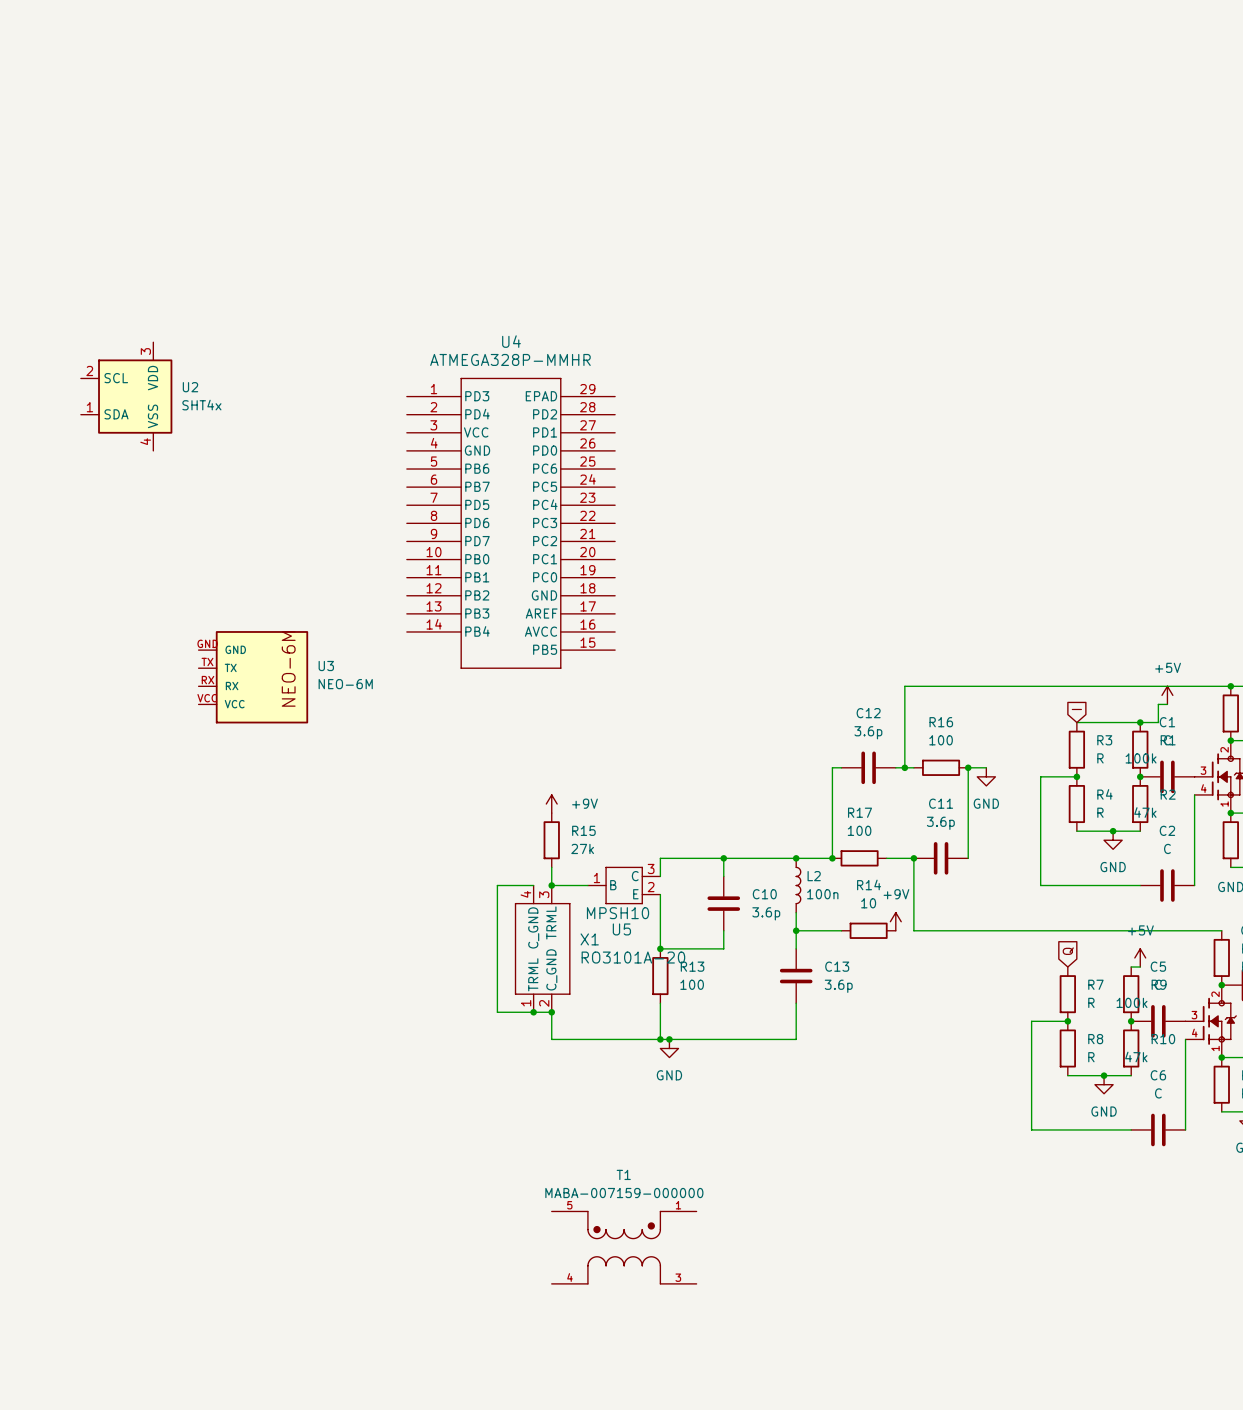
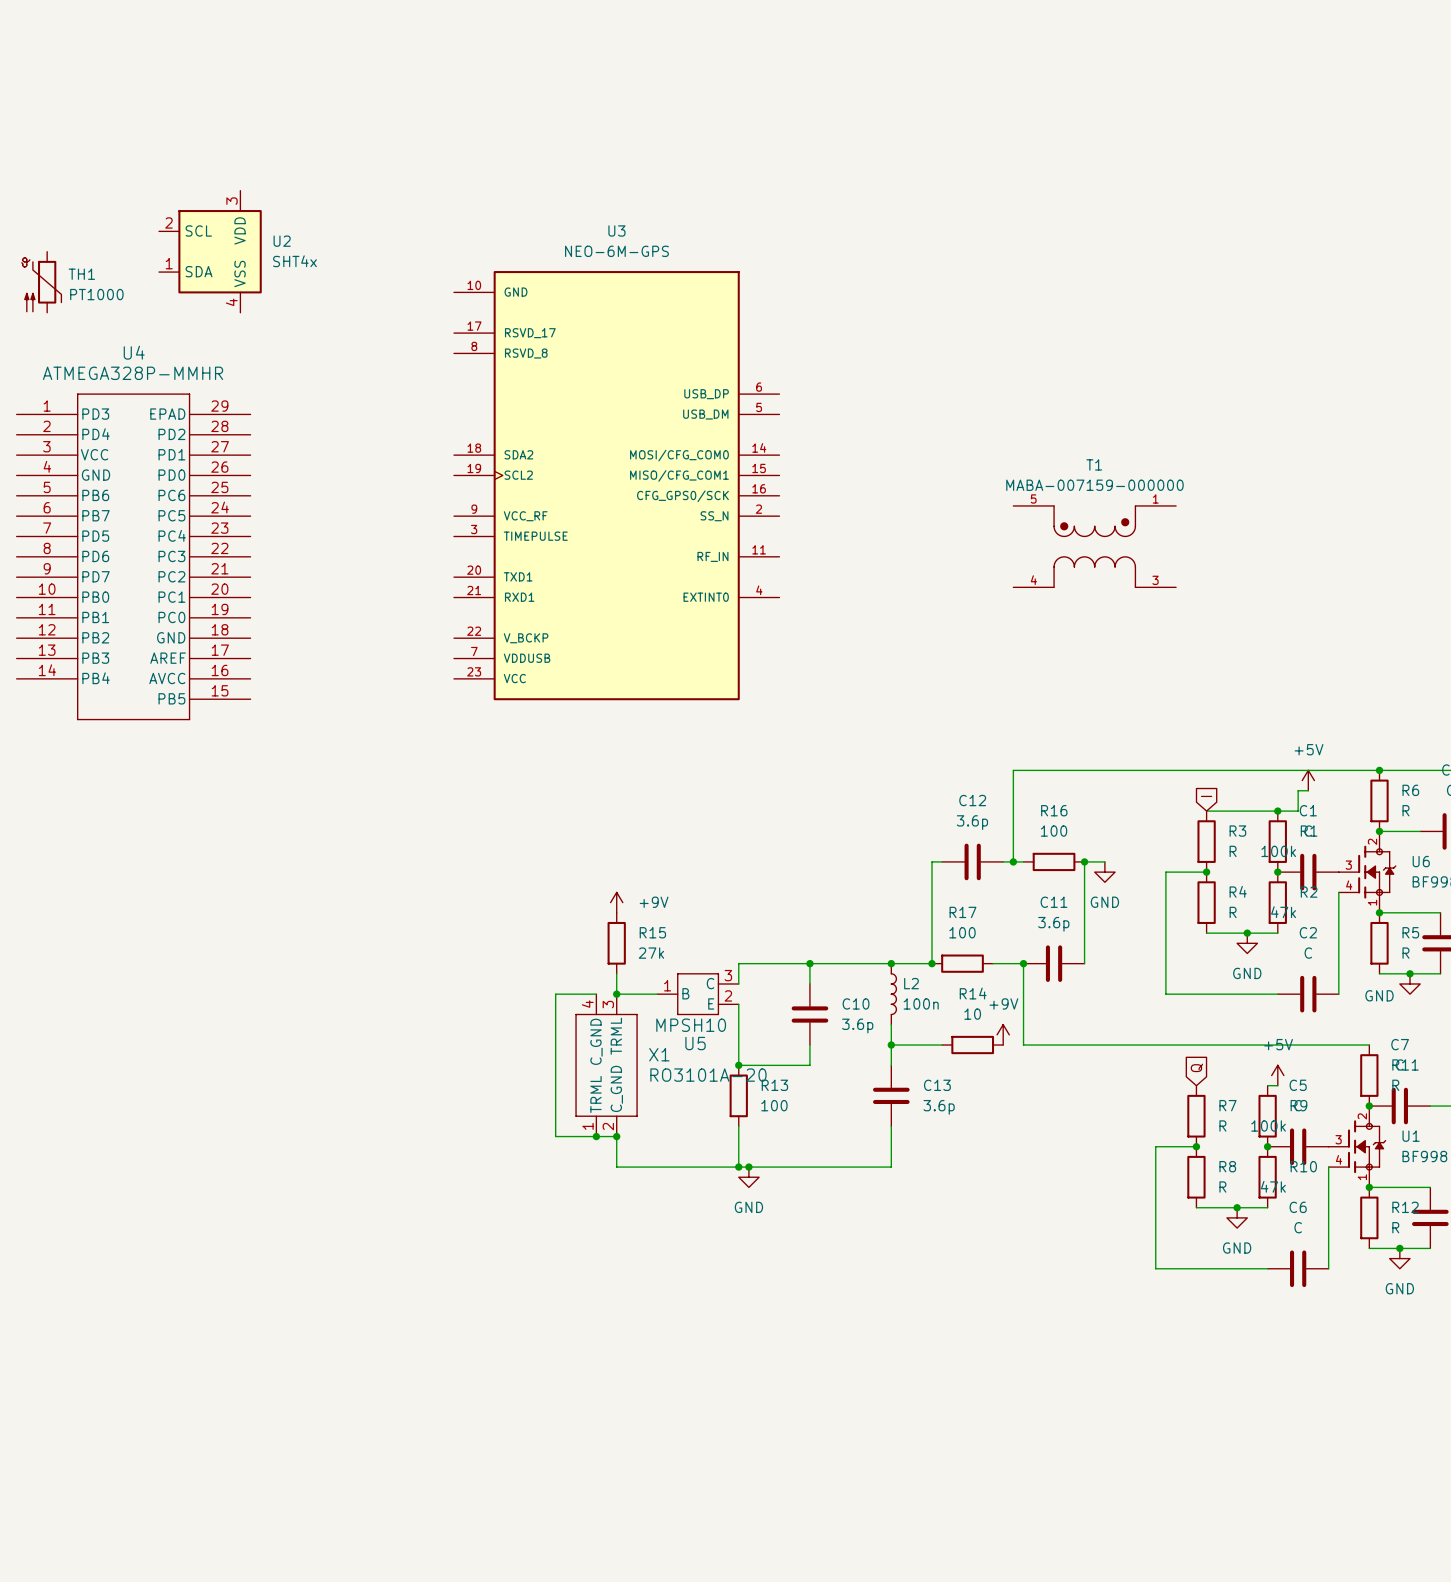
TH1: none -> PT1000 (41, 282)
U2 position: (126, 396) -> (210, 251)
U4 position: (510, 523) -> (133, 556)
U3 symbol: [198, 631, 309, 724] -> [453, 271, 780, 701]
U3 name position: U3 (326, 666) -> U3 (616, 230)
U3 value: NEO-6M (345, 684) -> NEO-6M-GPS (616, 251)
T1 position: (624, 1247) -> (1094, 546)

